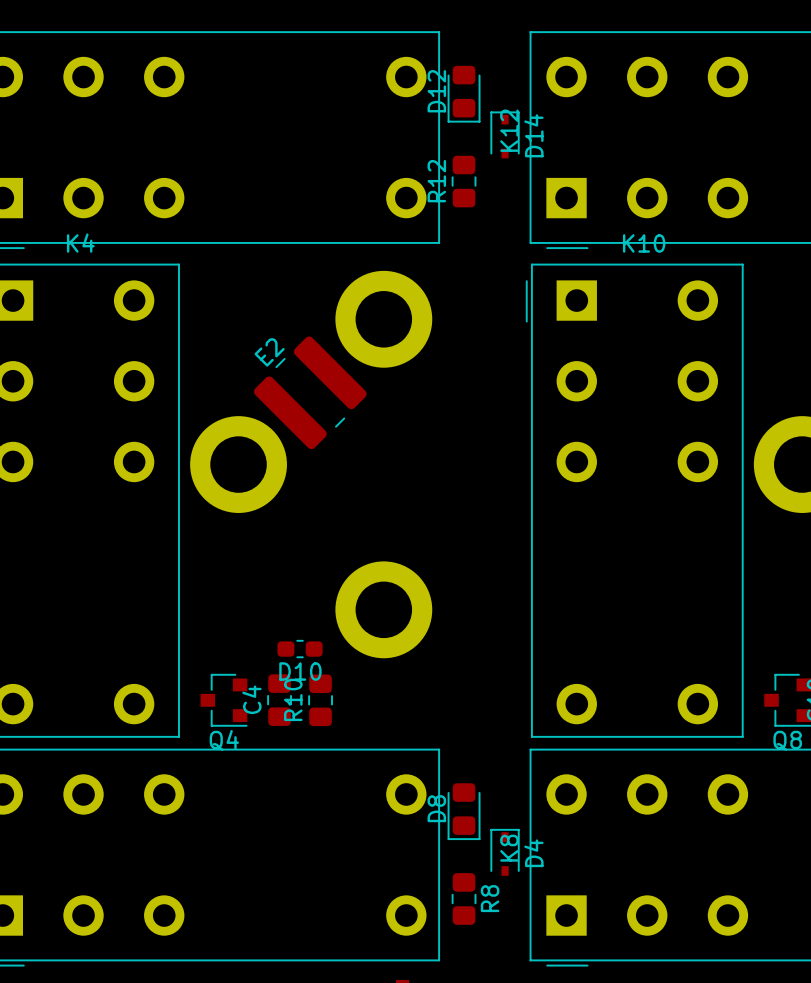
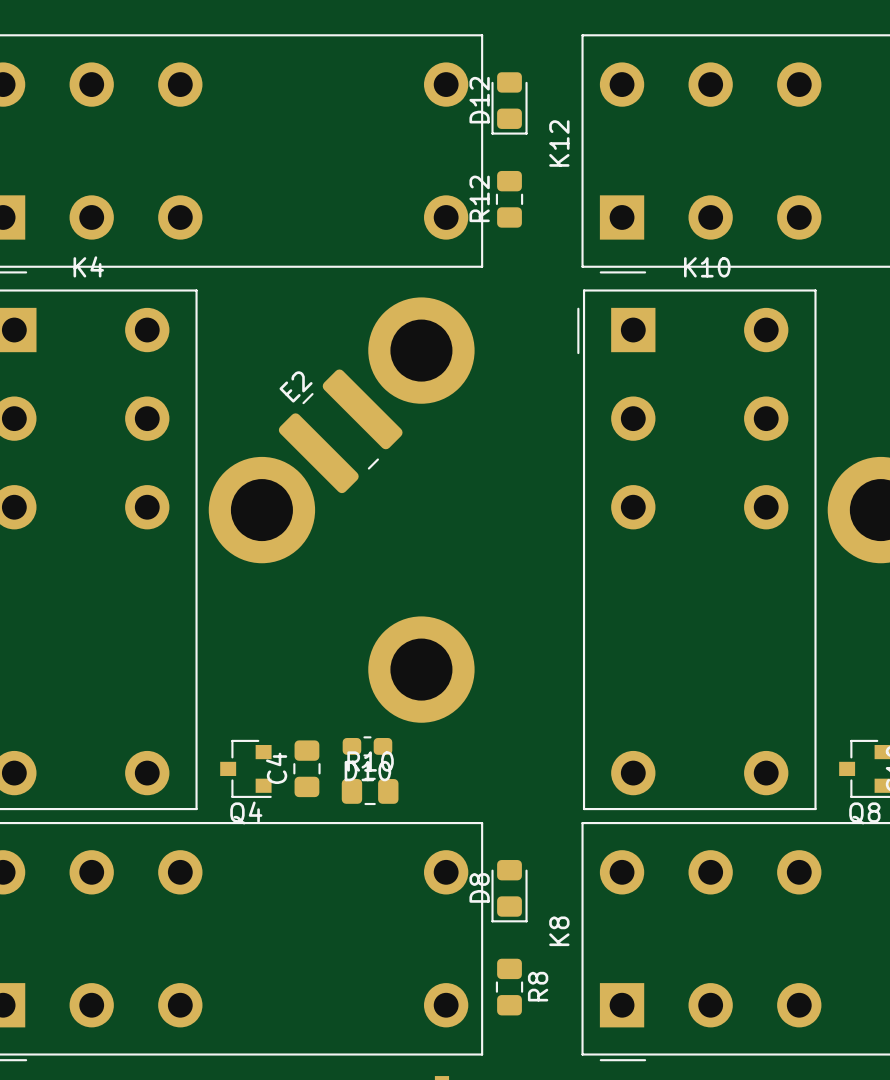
D14: (505, 134) -> none
D10 position: (300, 649) -> (367, 746)
R10 rotation: 0° (320, 700) -> 90° clockwise (370, 791)
D4: (505, 852) -> none

